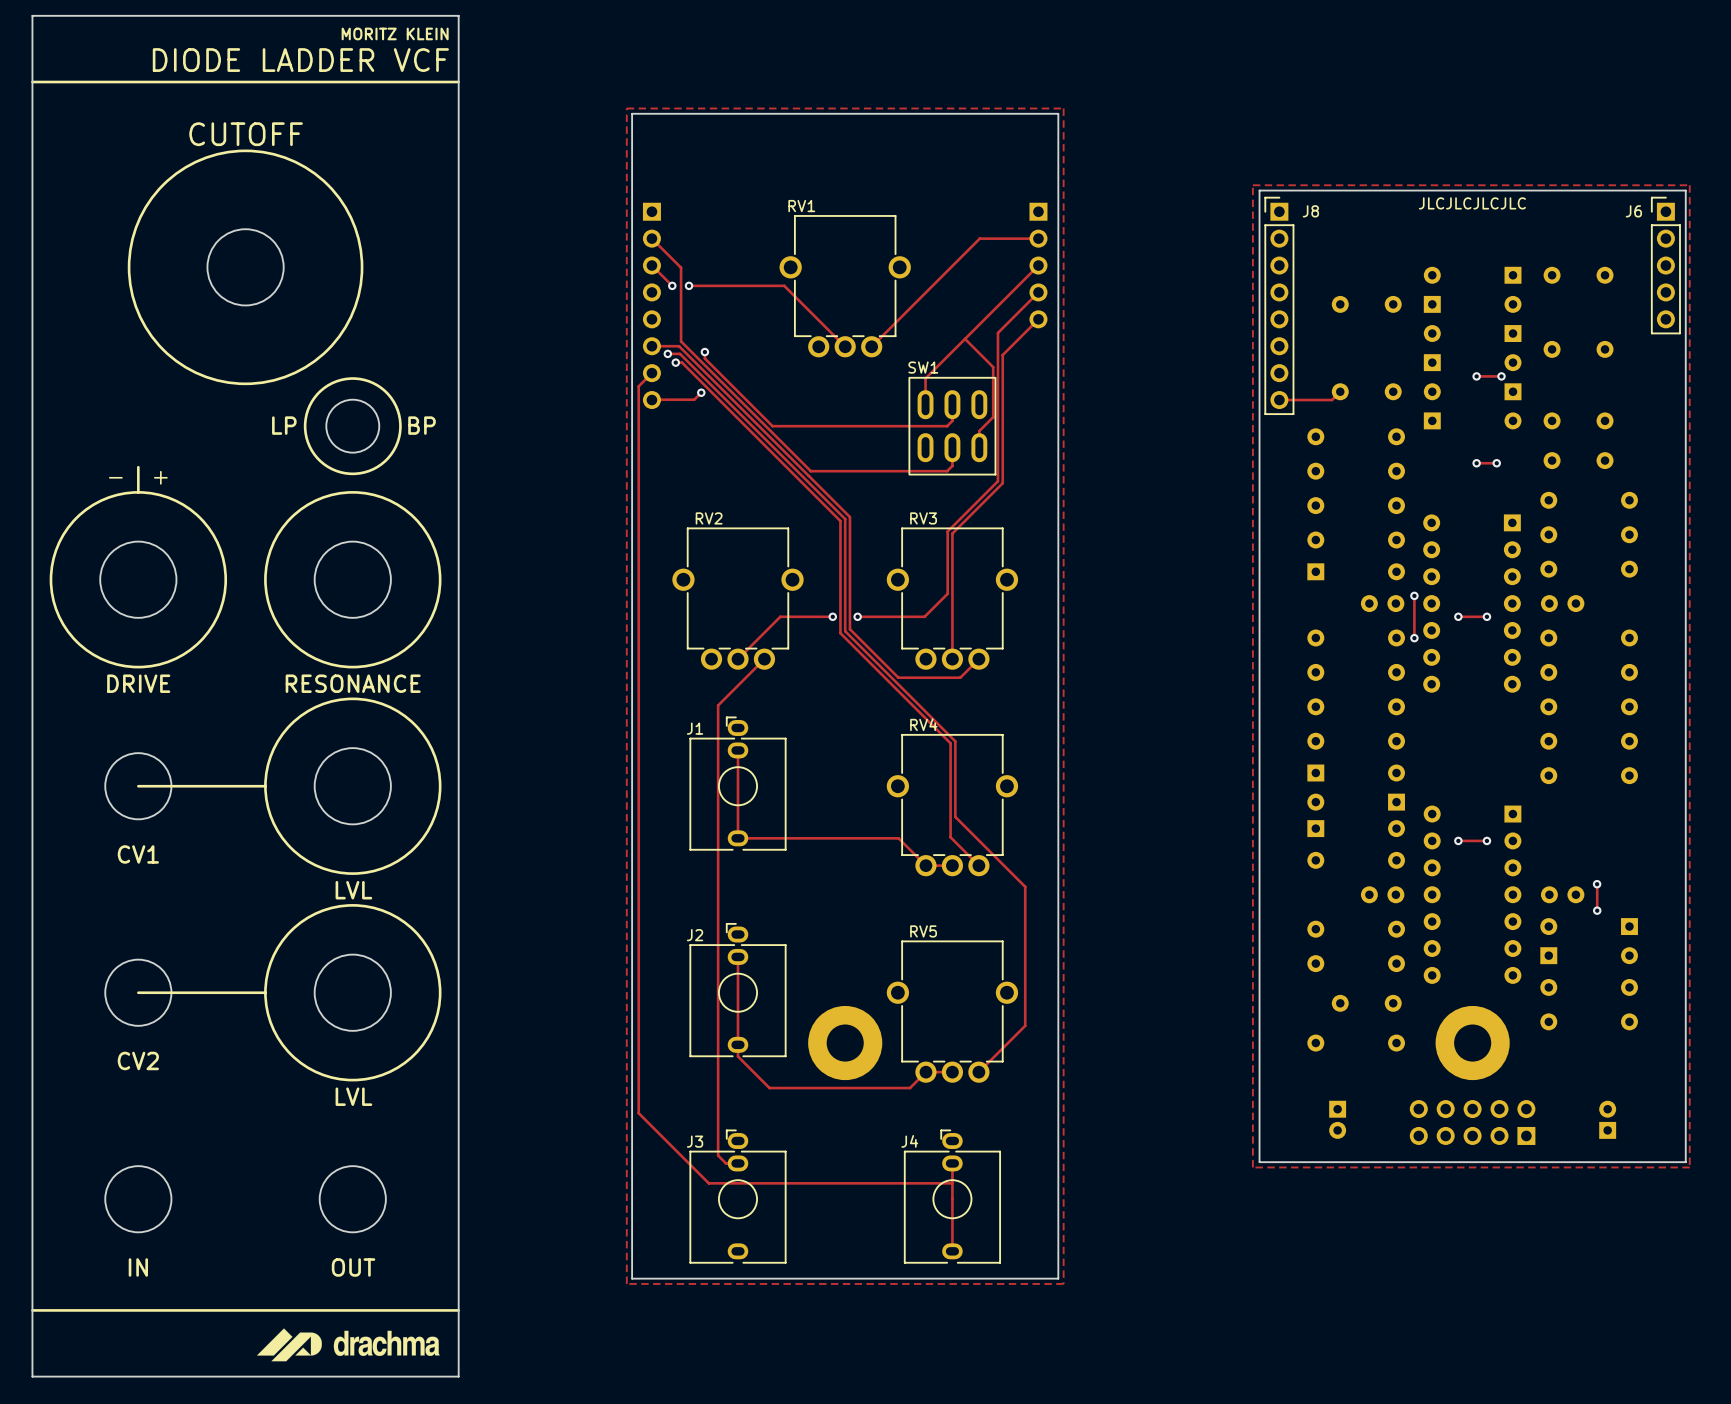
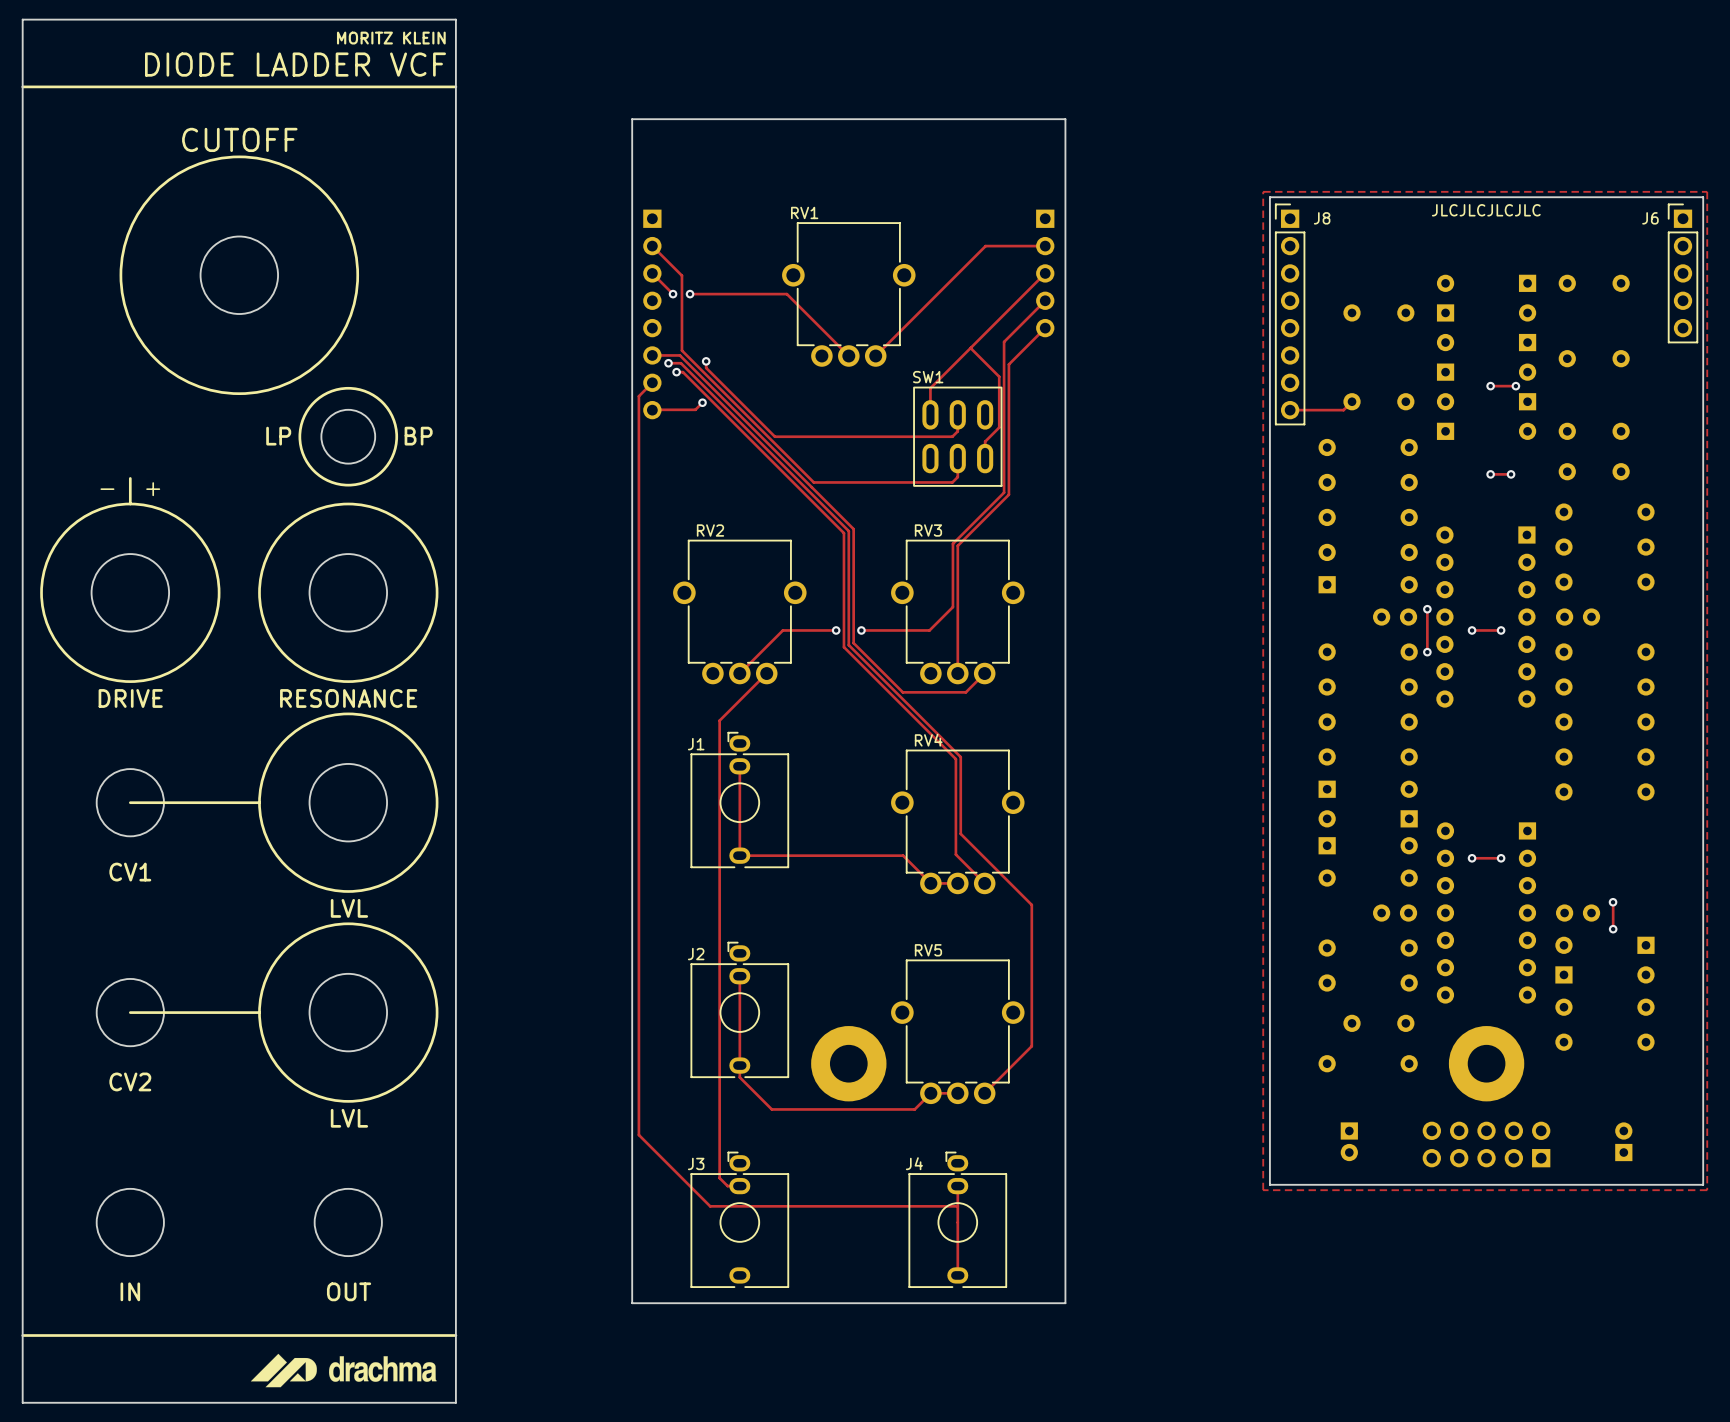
zone outline: (626, 108) (626, 1283) (1063, 1283) (1063, 108) (626, 108) -> none

